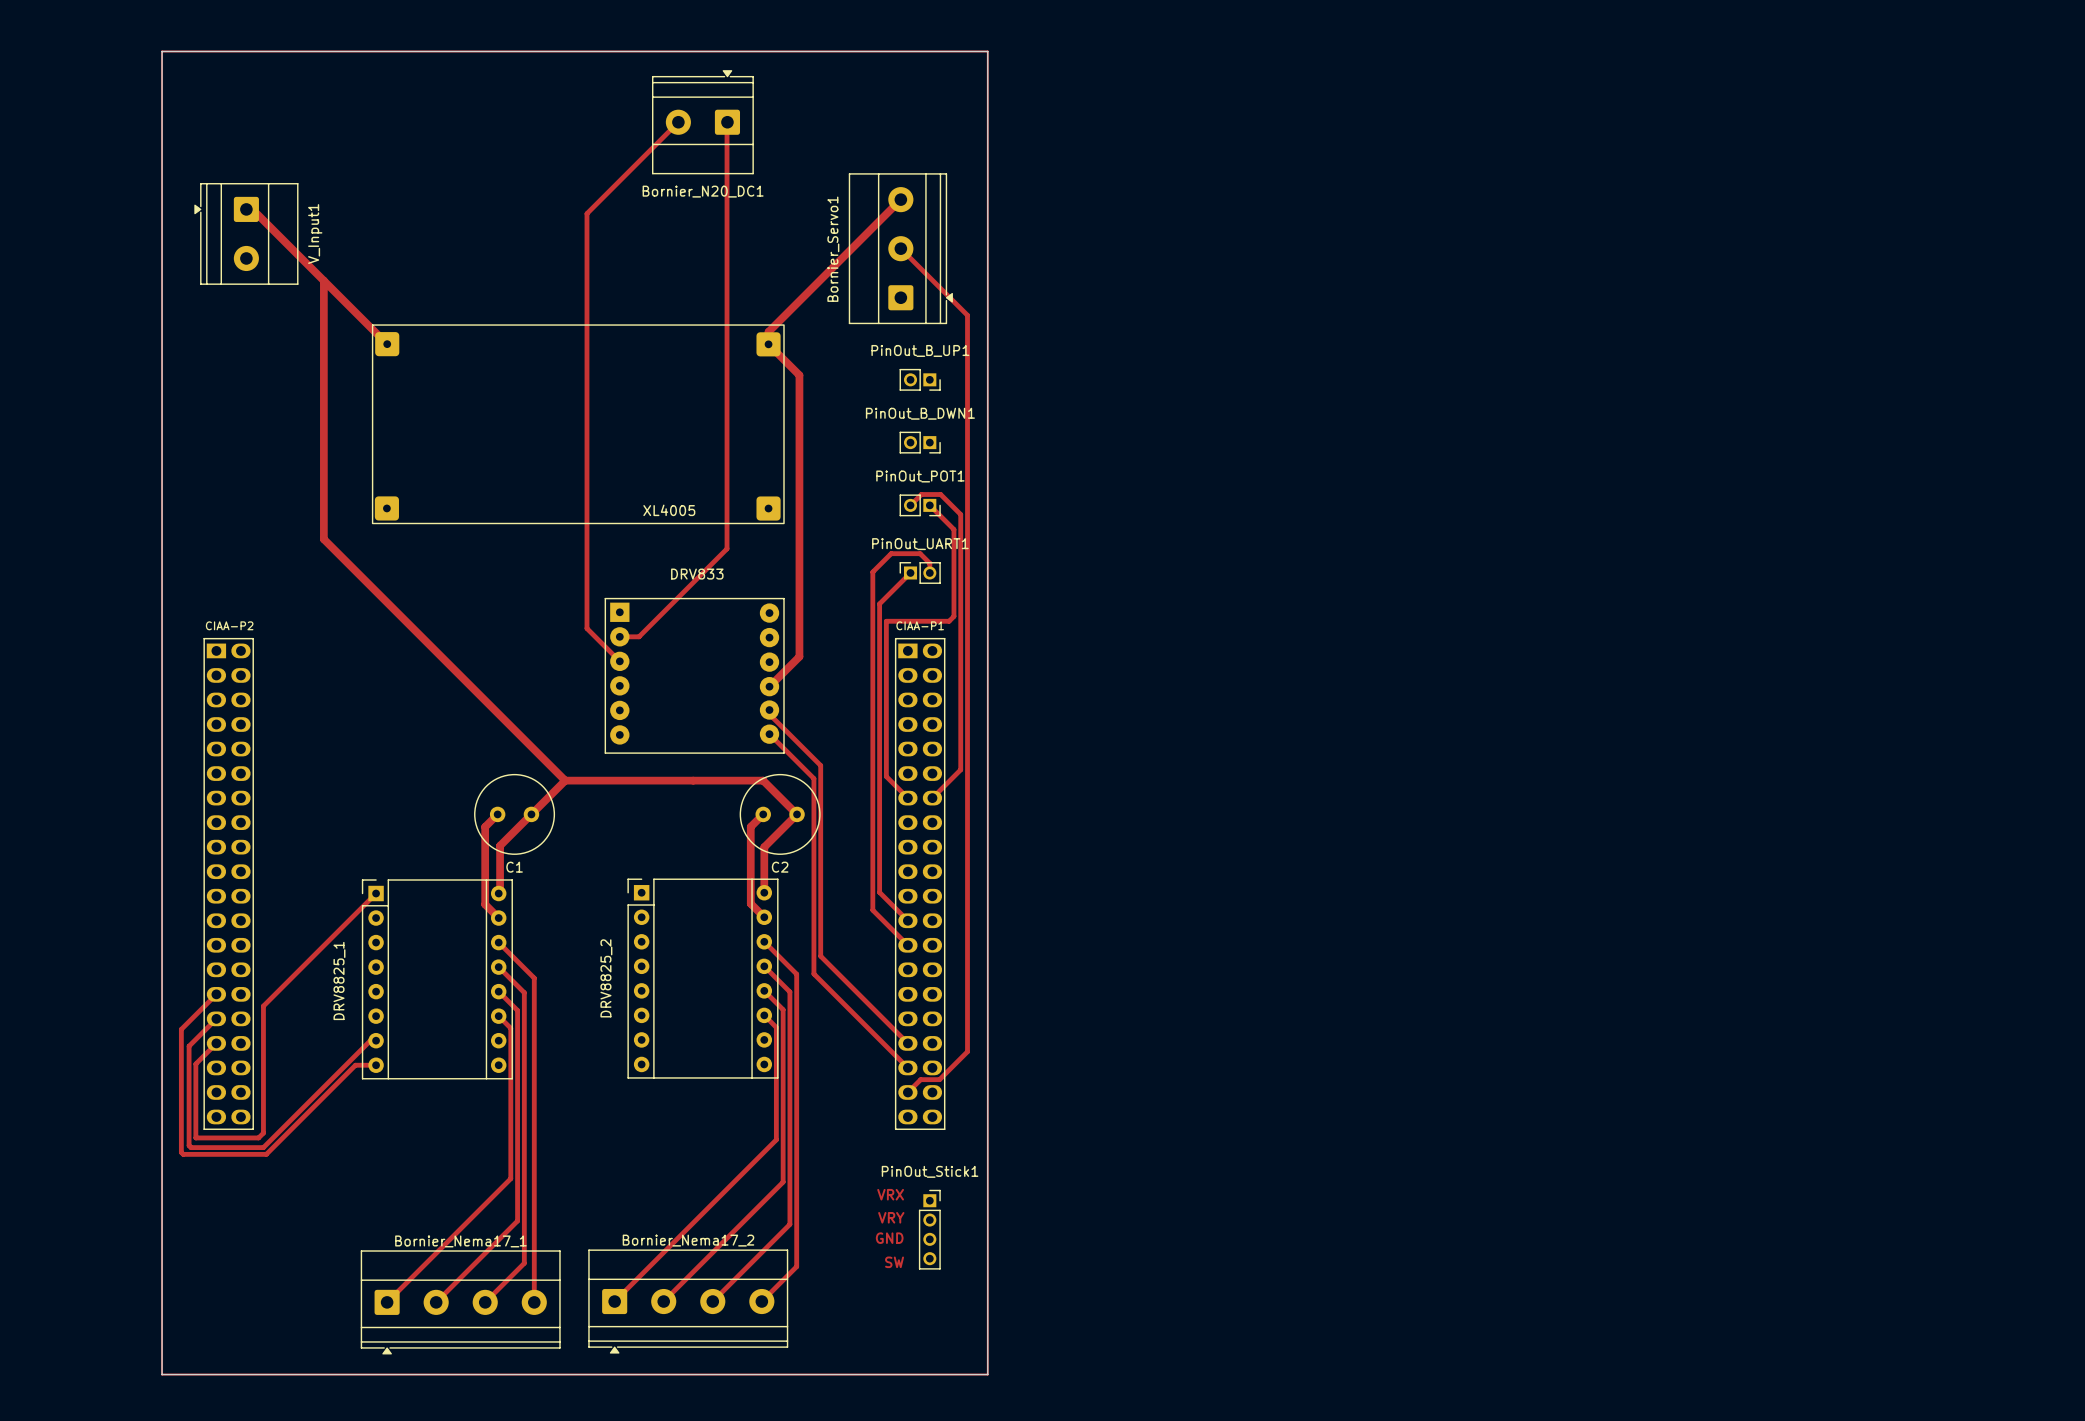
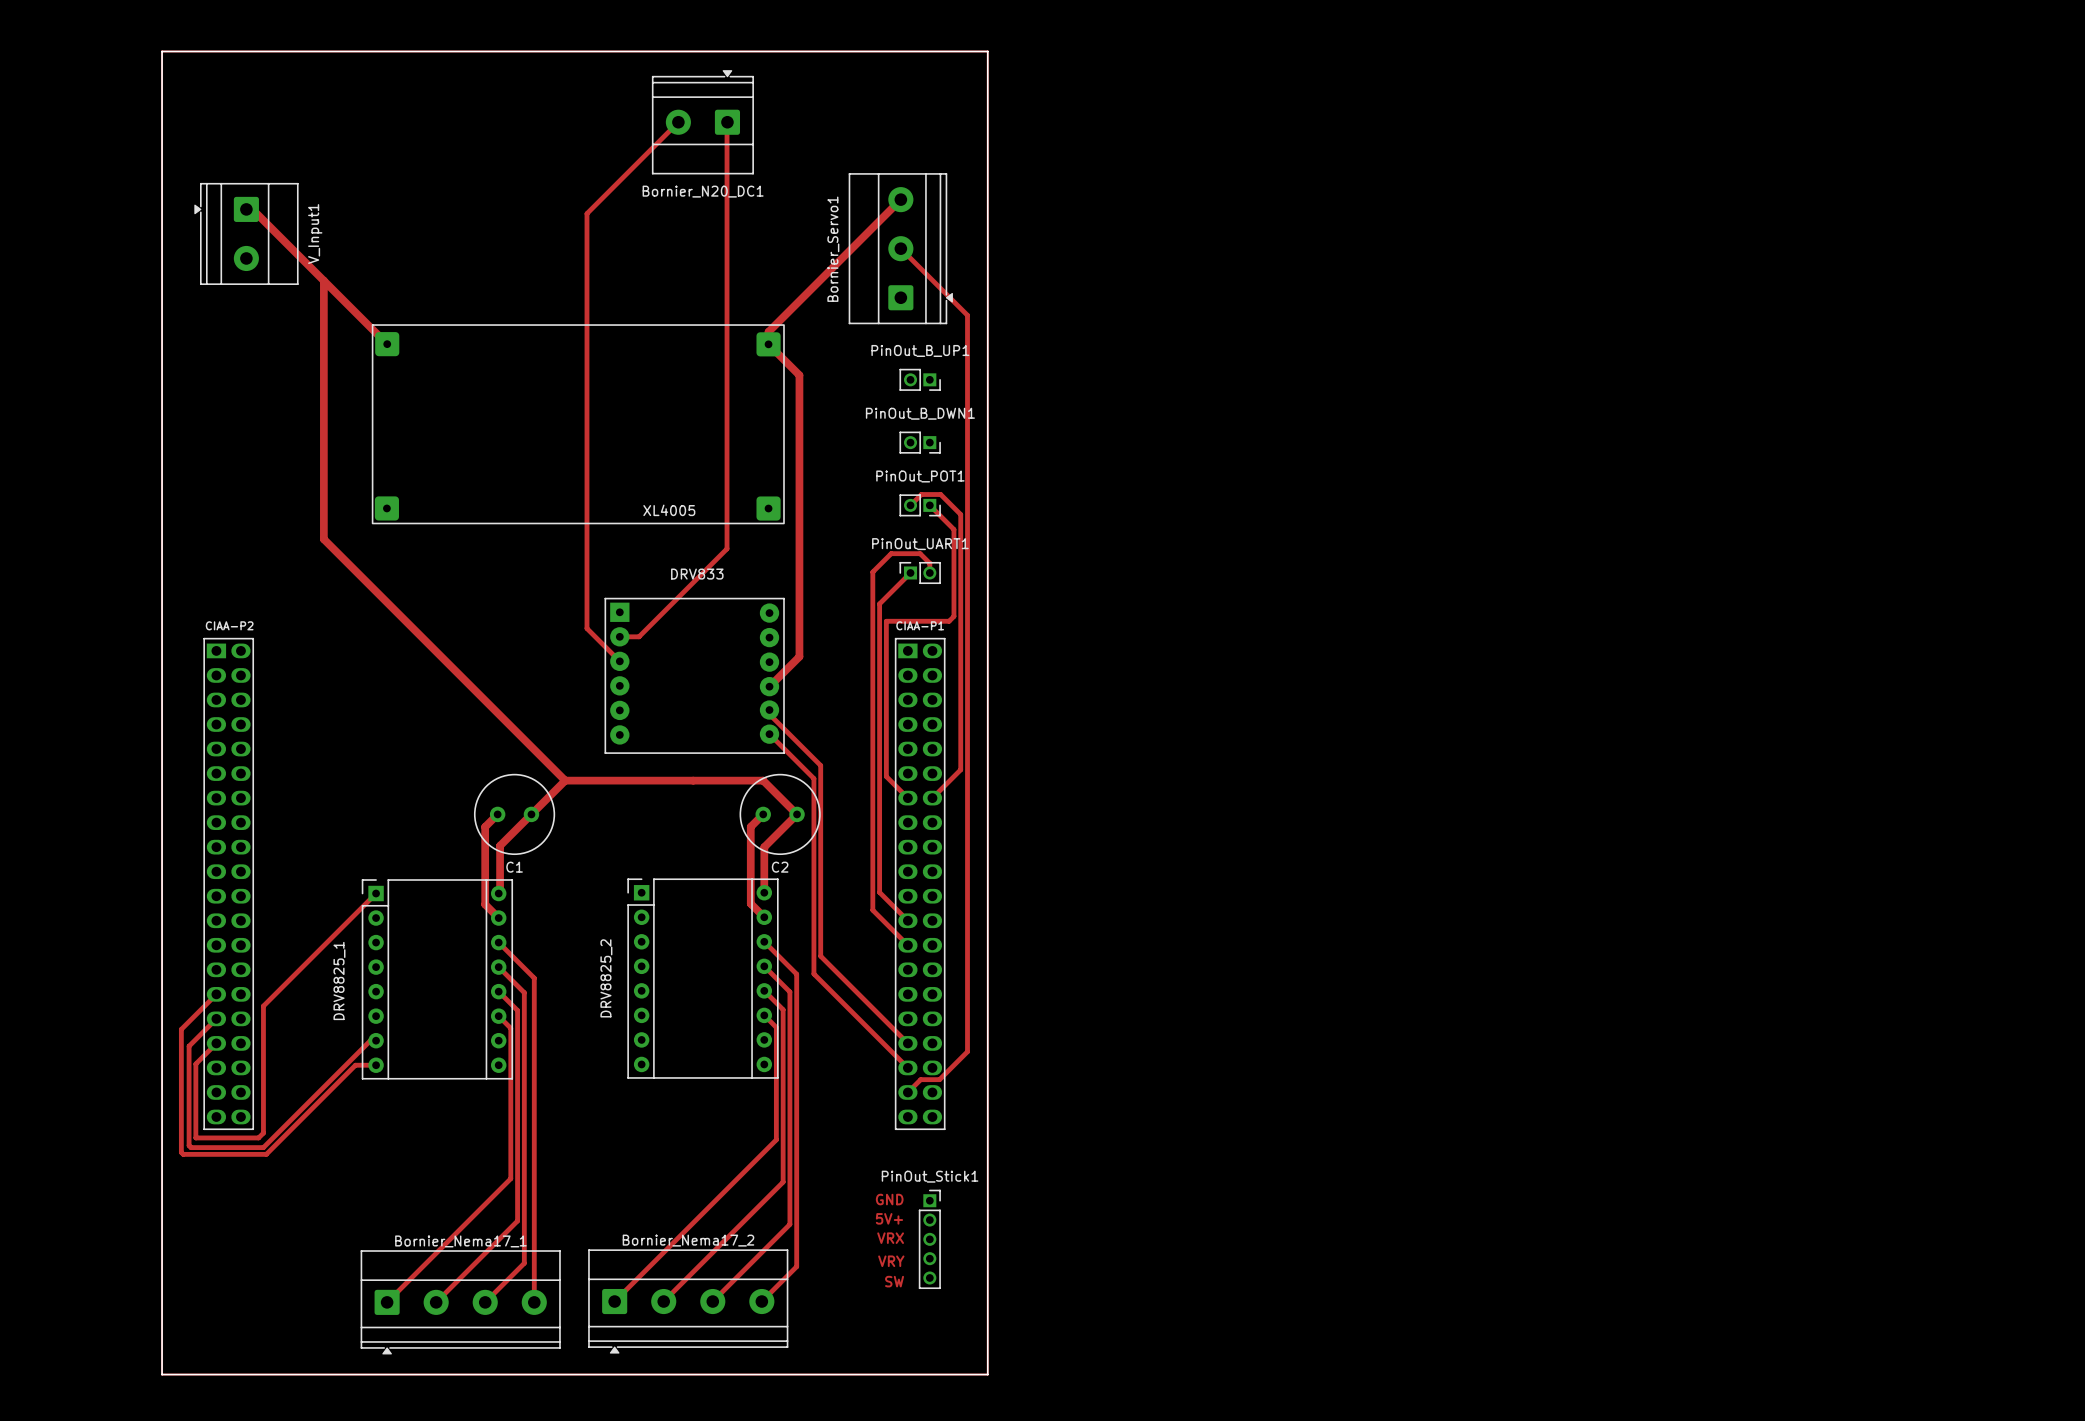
PinOut_Stick1 footprint: [919, 1189, 941, 1270] -> [919, 1189, 941, 1289]
text: VRX (890, 1194) -> GND (889, 1199)
text: VRY (891, 1217) -> 5V+ (889, 1218)
text: GND (889, 1238) -> VRX (890, 1238)
text: SW (894, 1262) -> VRY (891, 1261)
text: none -> SW (894, 1281)

